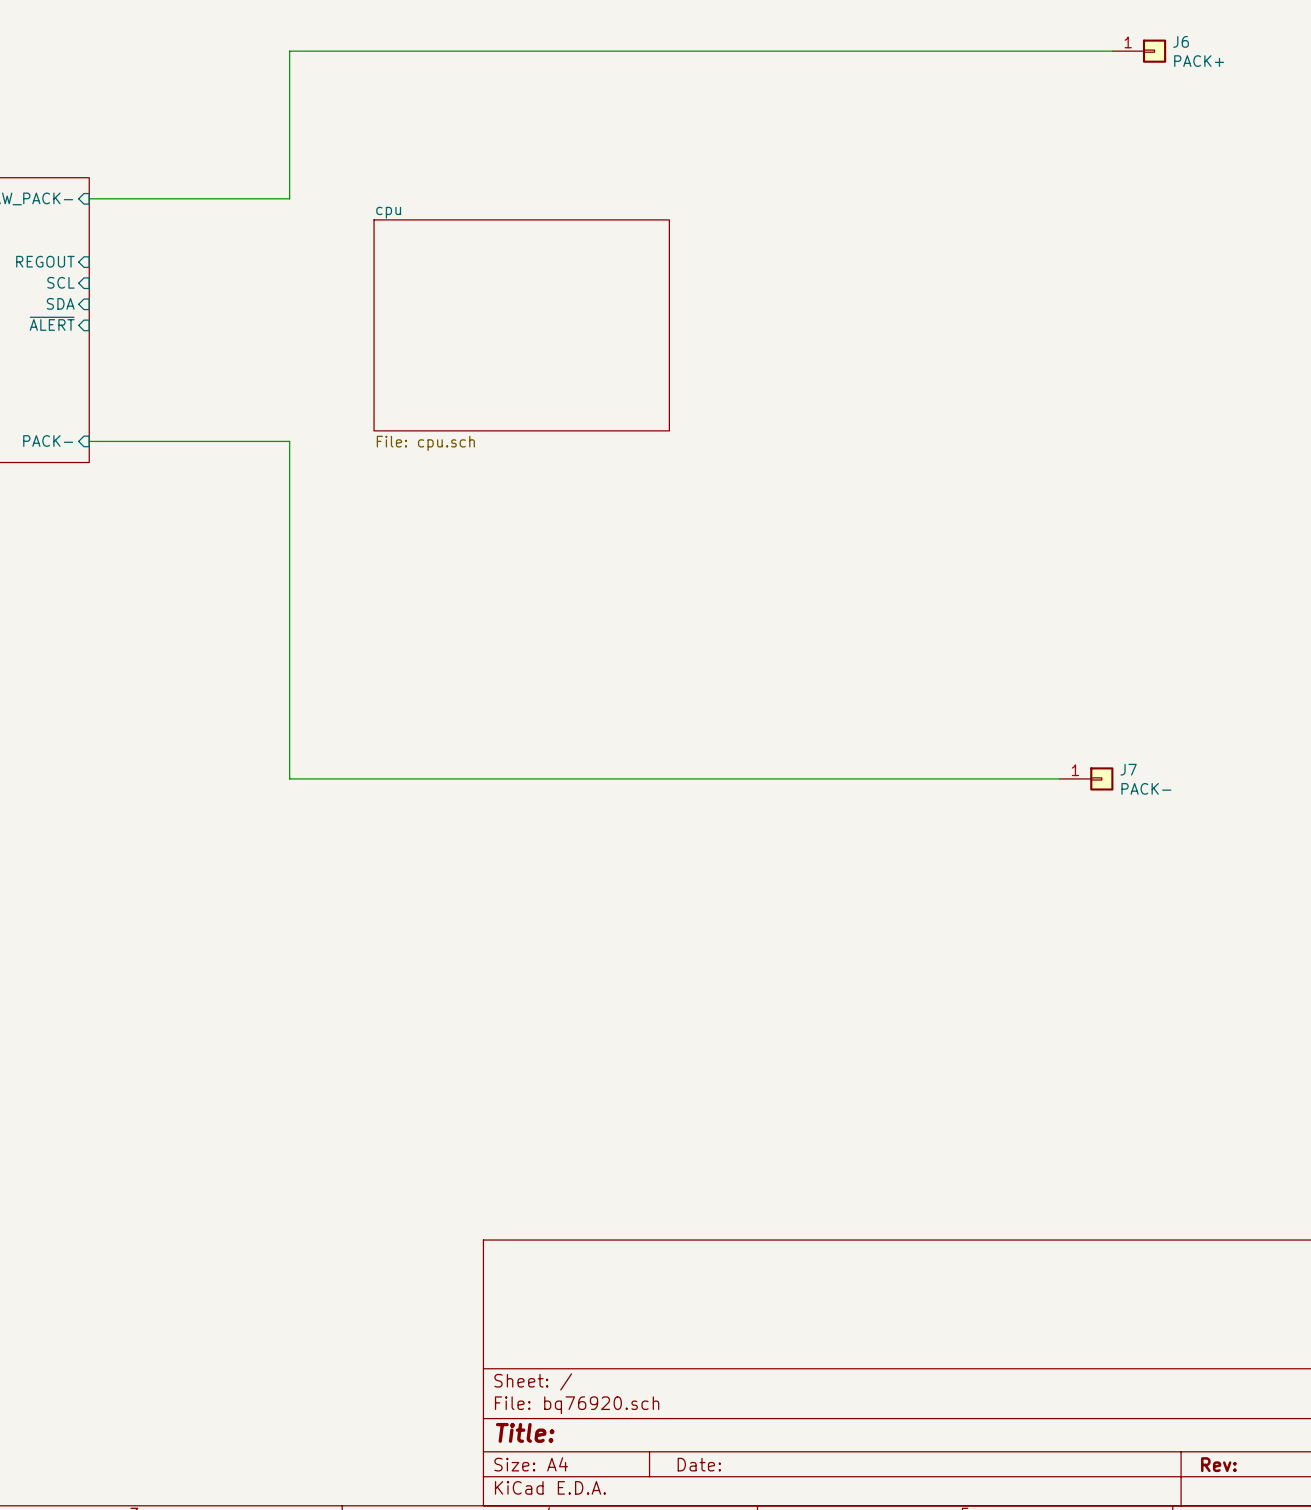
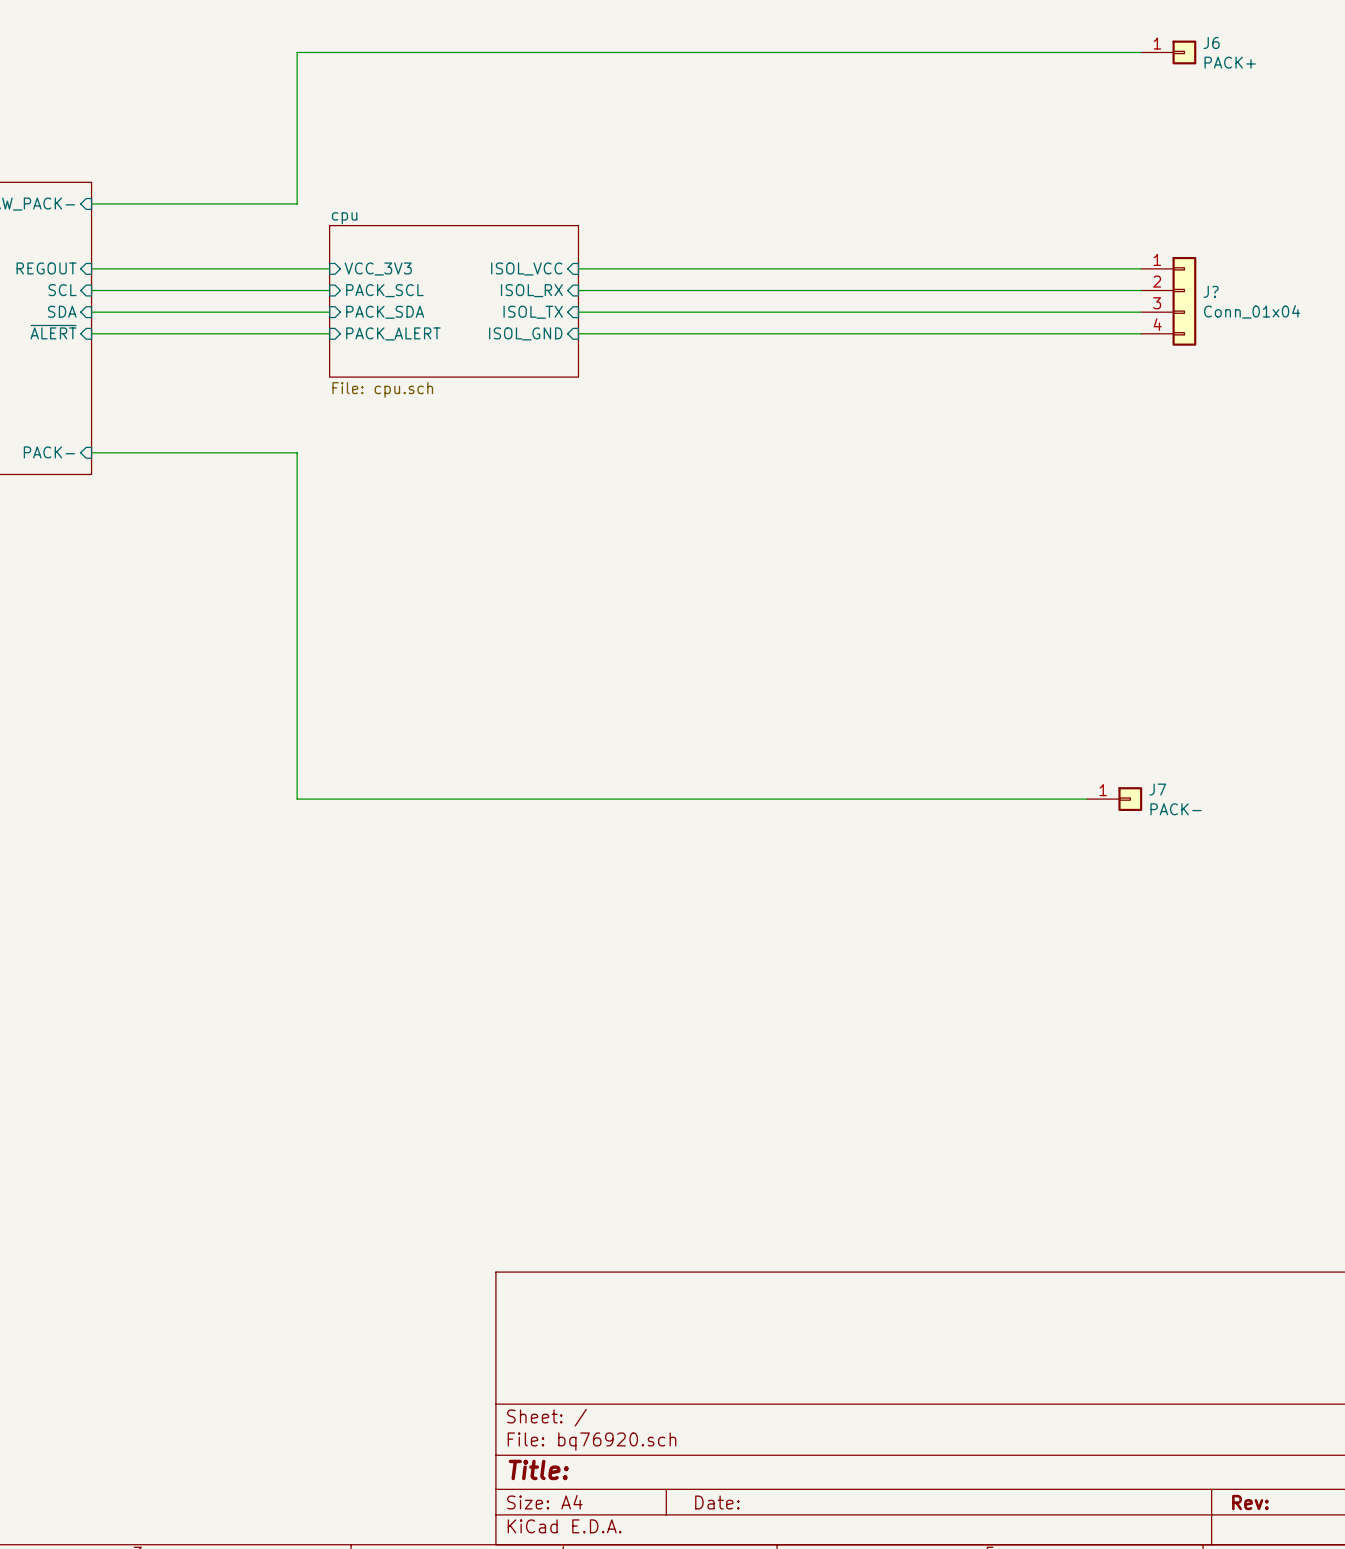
wire: none -> (91, 268) (329, 268)
sheet pin: none -> VCC_3V3 (378, 268)
sheet pin: none -> ISOL_VCC (526, 268)
wire: none -> (578, 268) (1141, 268)
wire: none -> (91, 290) (329, 290)
sheet pin: none -> PACK_SCL (384, 290)
sheet pin: none -> ISOL_RX (531, 290)
wire: none -> (578, 290) (1141, 290)
sheet cpu: none -> File: cpu.sch (454, 301)
J?: none -> Conn_01x04 (1168, 301)
wire: none -> (91, 312) (329, 312)
sheet pin: none -> PACK_SDA (385, 312)
sheet pin: none -> ISOL_TX (533, 312)
wire: none -> (578, 312) (1141, 312)
wire: none -> (91, 333) (329, 333)
sheet pin: none -> PACK_ALERT (393, 333)
sheet pin: none -> ISOL_GND (525, 333)
sheet cpu: File: cpu.sch (521, 325) -> none
wire: none -> (578, 333) (1141, 333)

